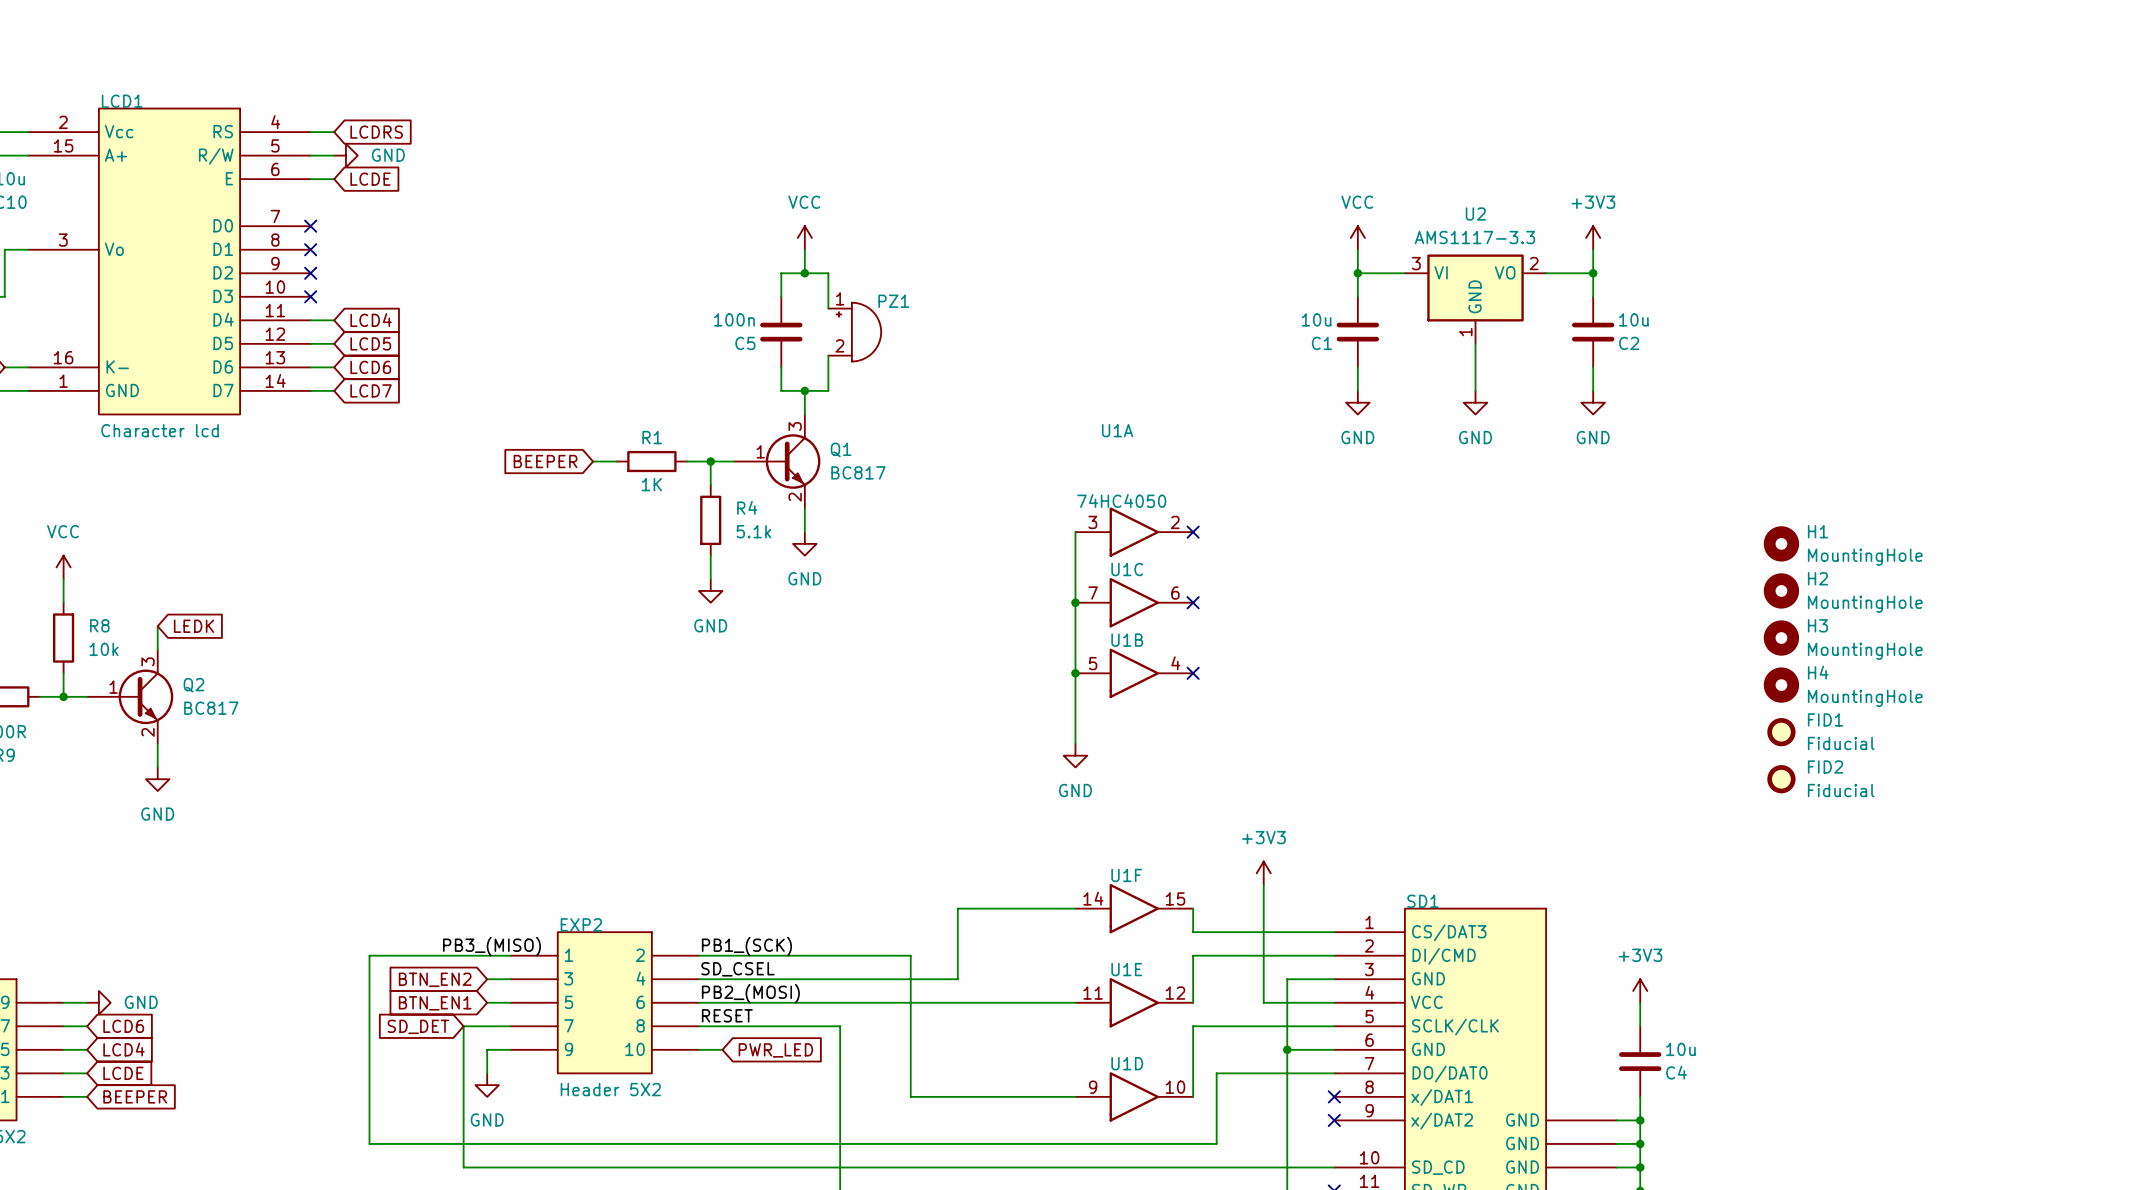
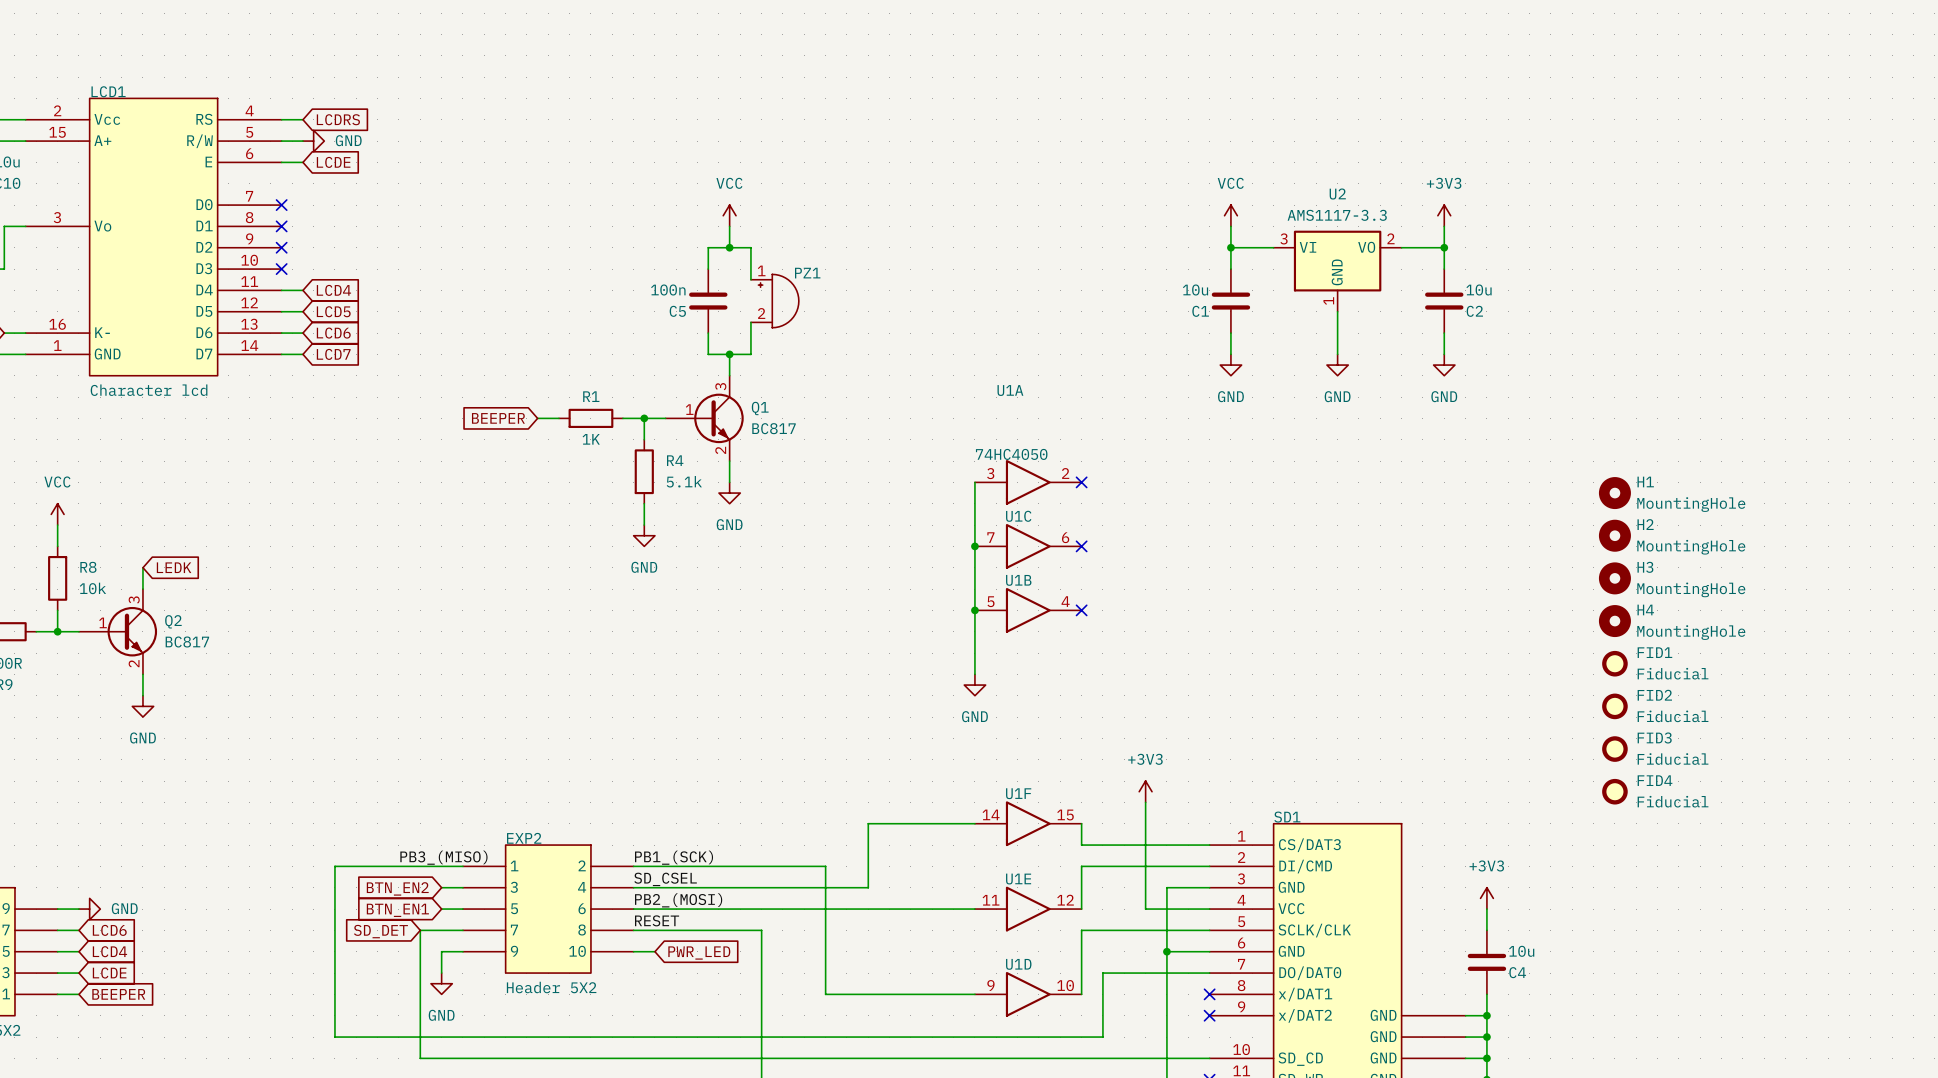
FID3: none -> Fiducial (1614, 749)
FID4: none -> Fiducial (1614, 791)

